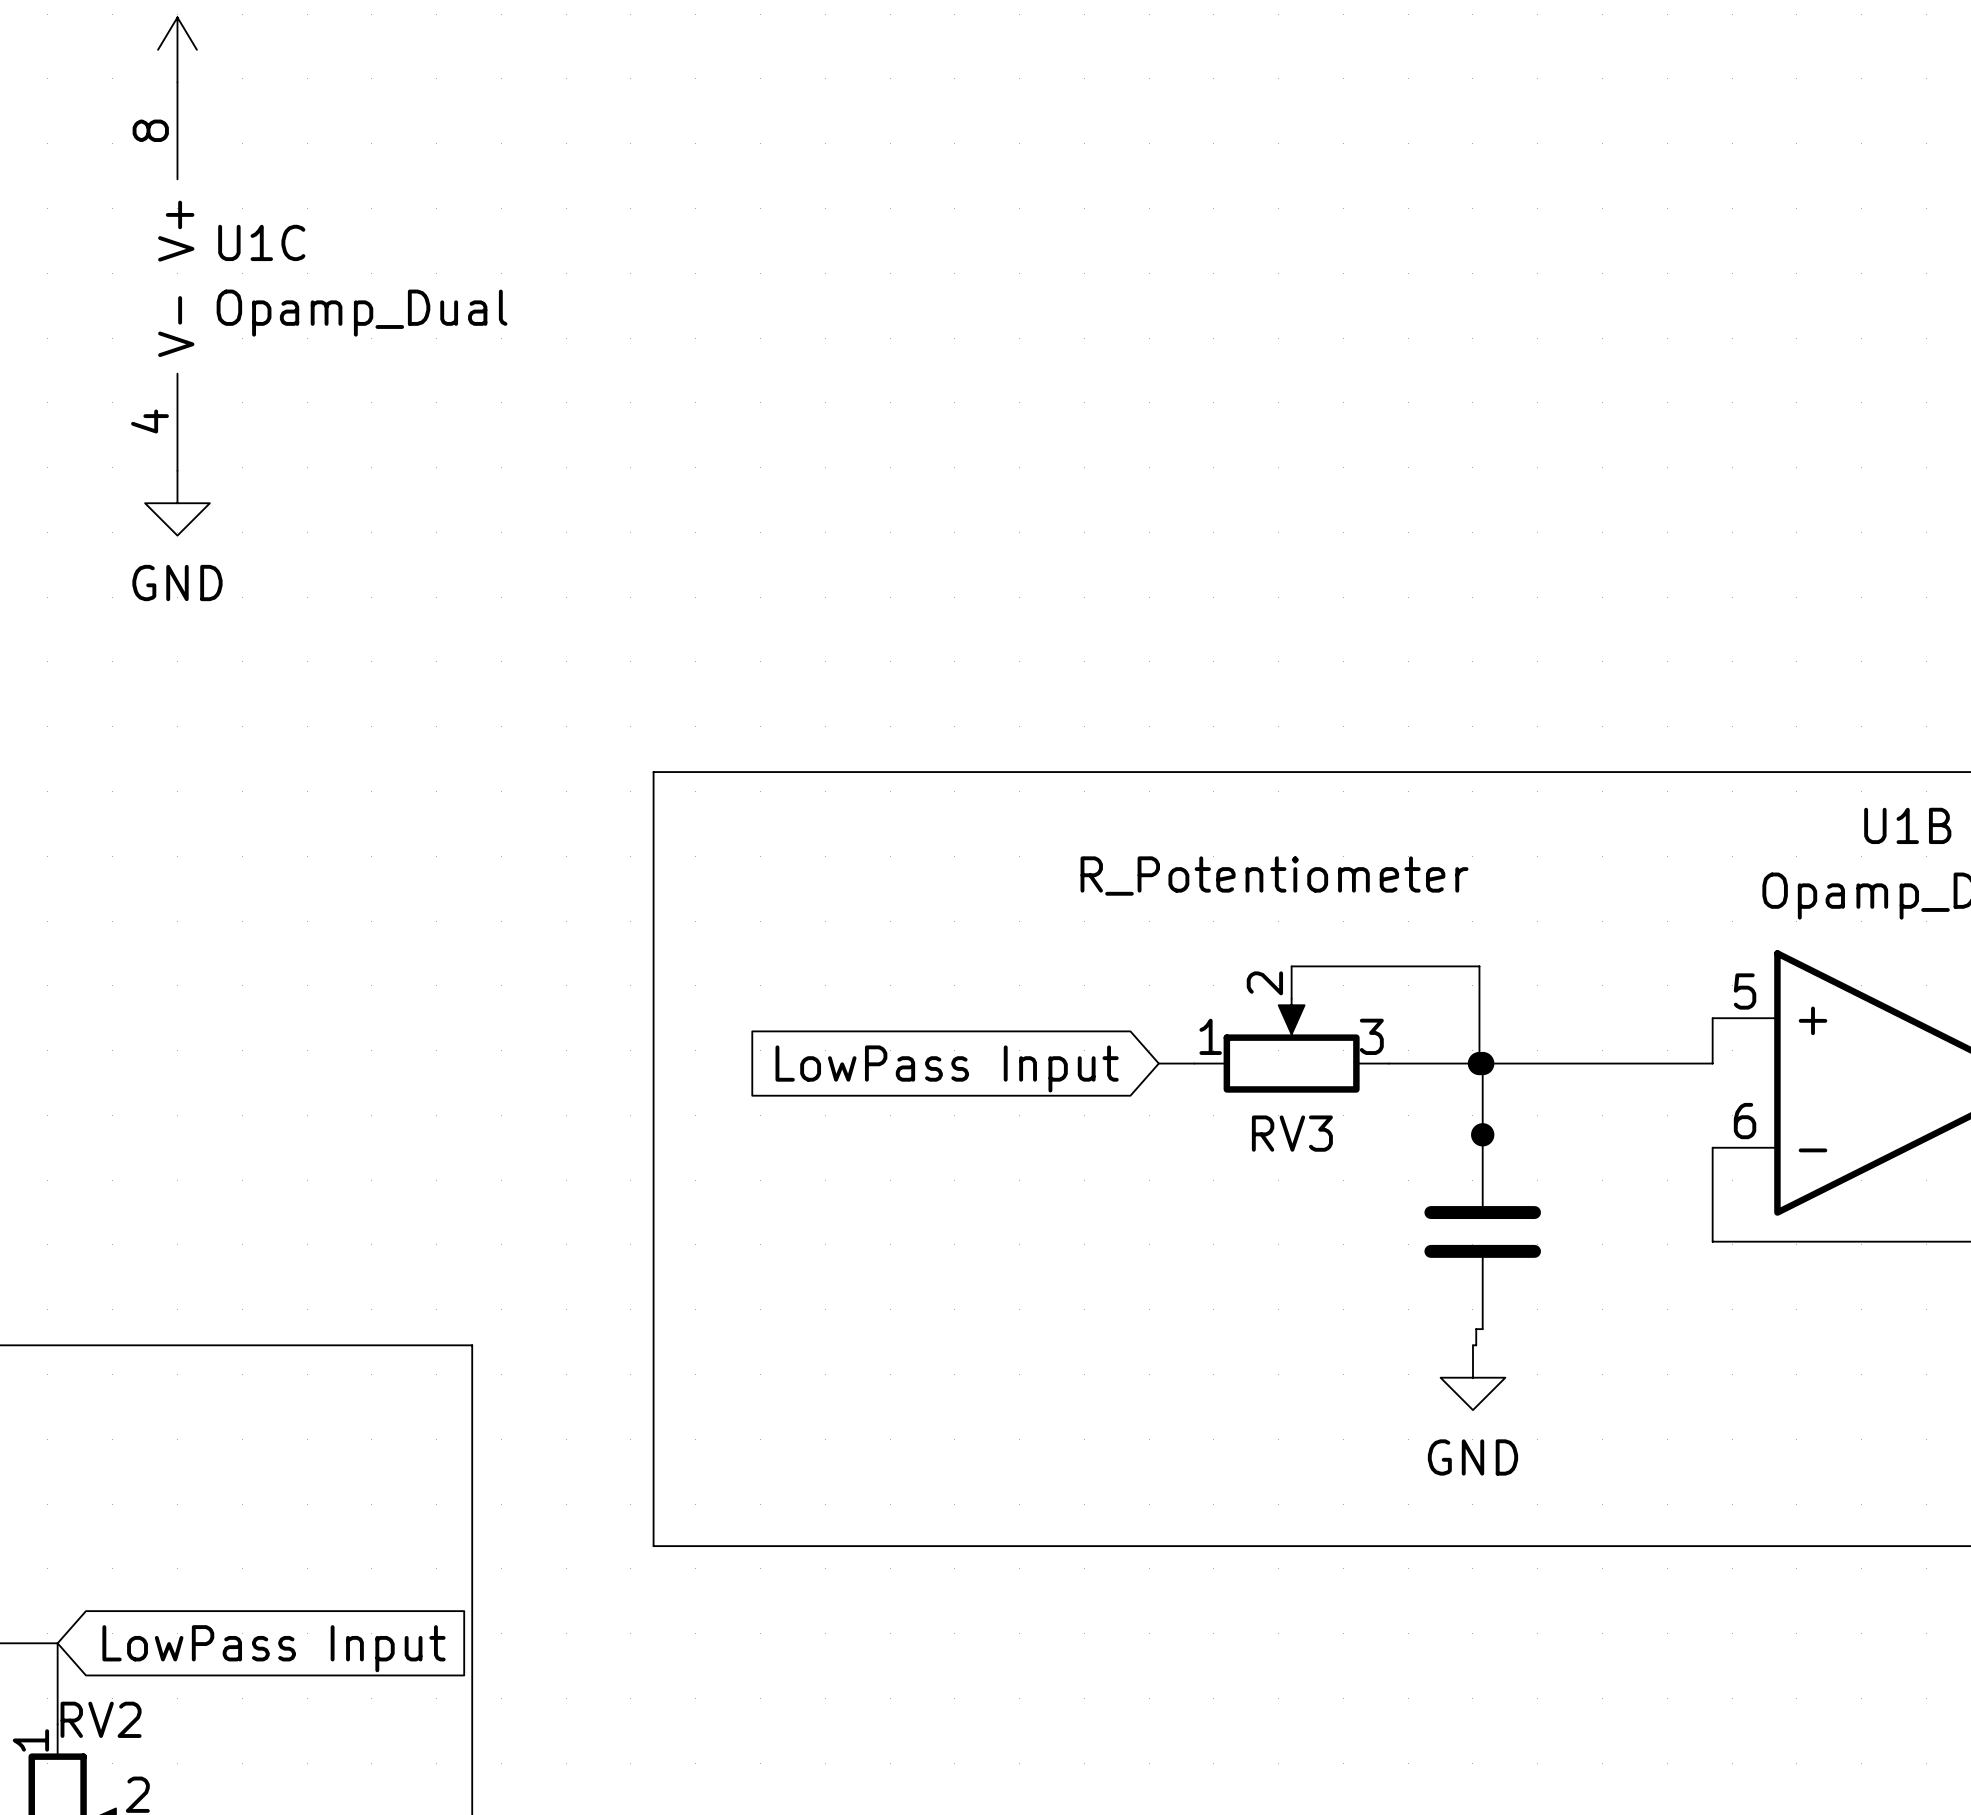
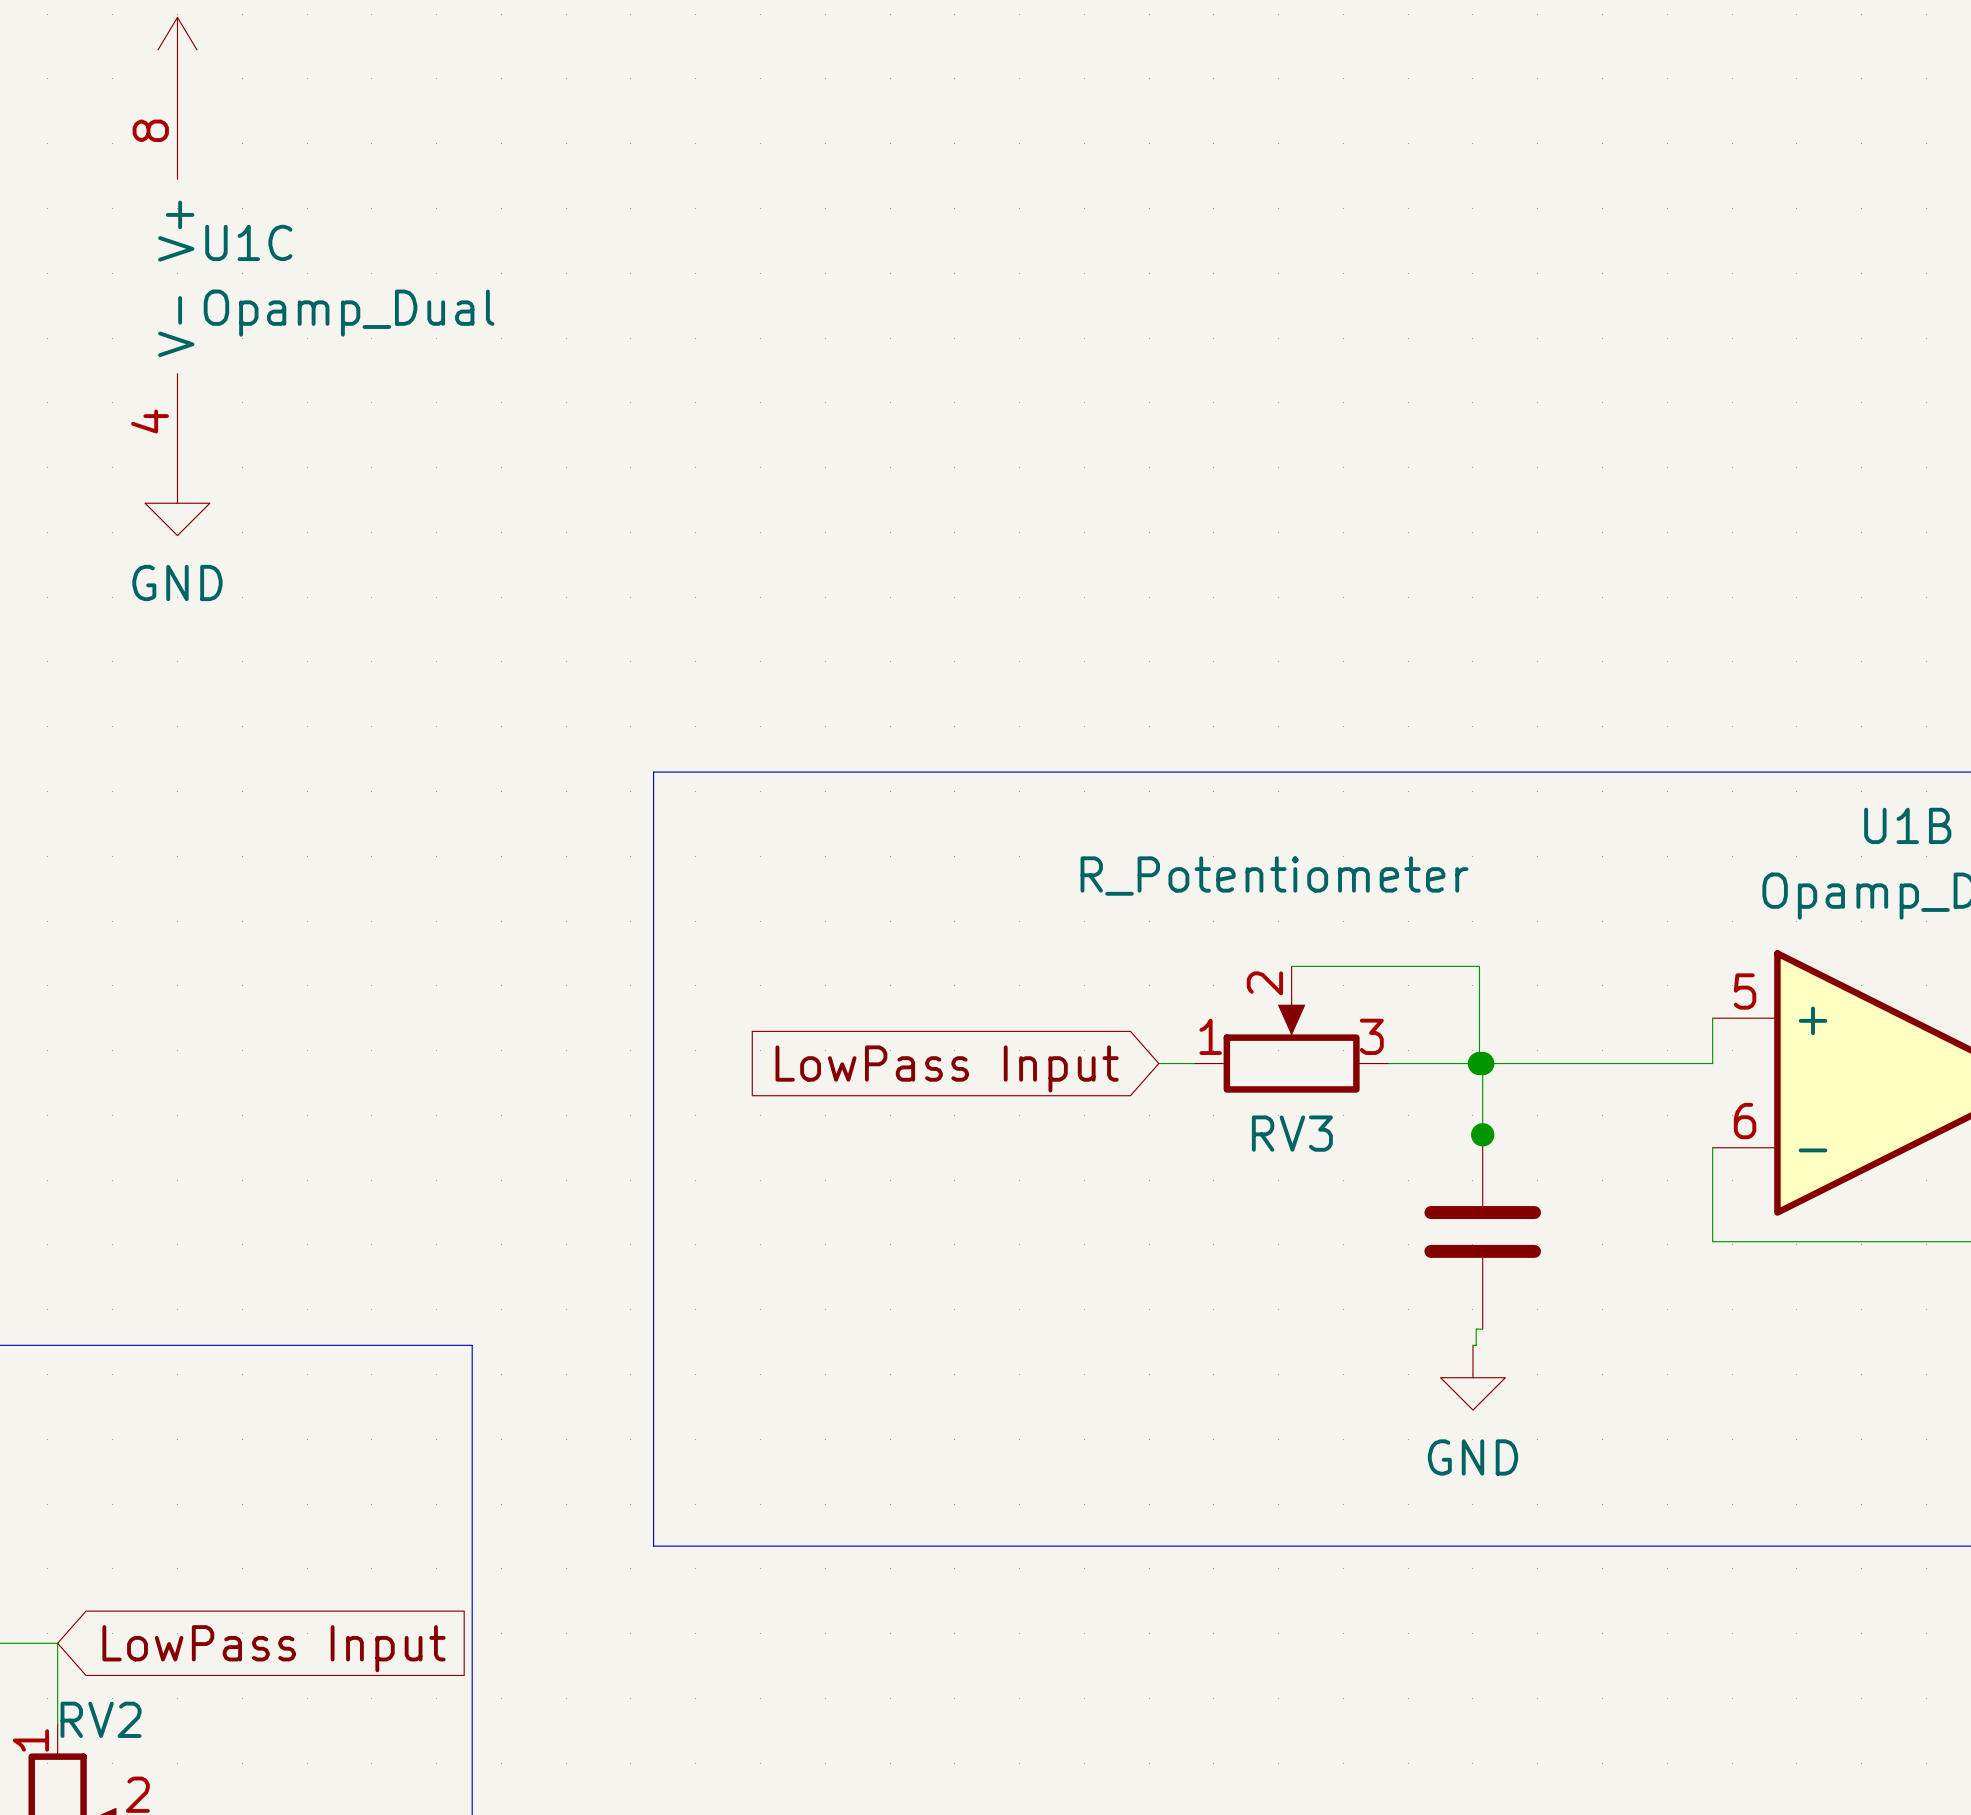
U1C name position: U1C (261, 242) -> U1C (248, 242)
U1C value position: Opamp_Dual (362, 313) -> Opamp_Dual (349, 313)

